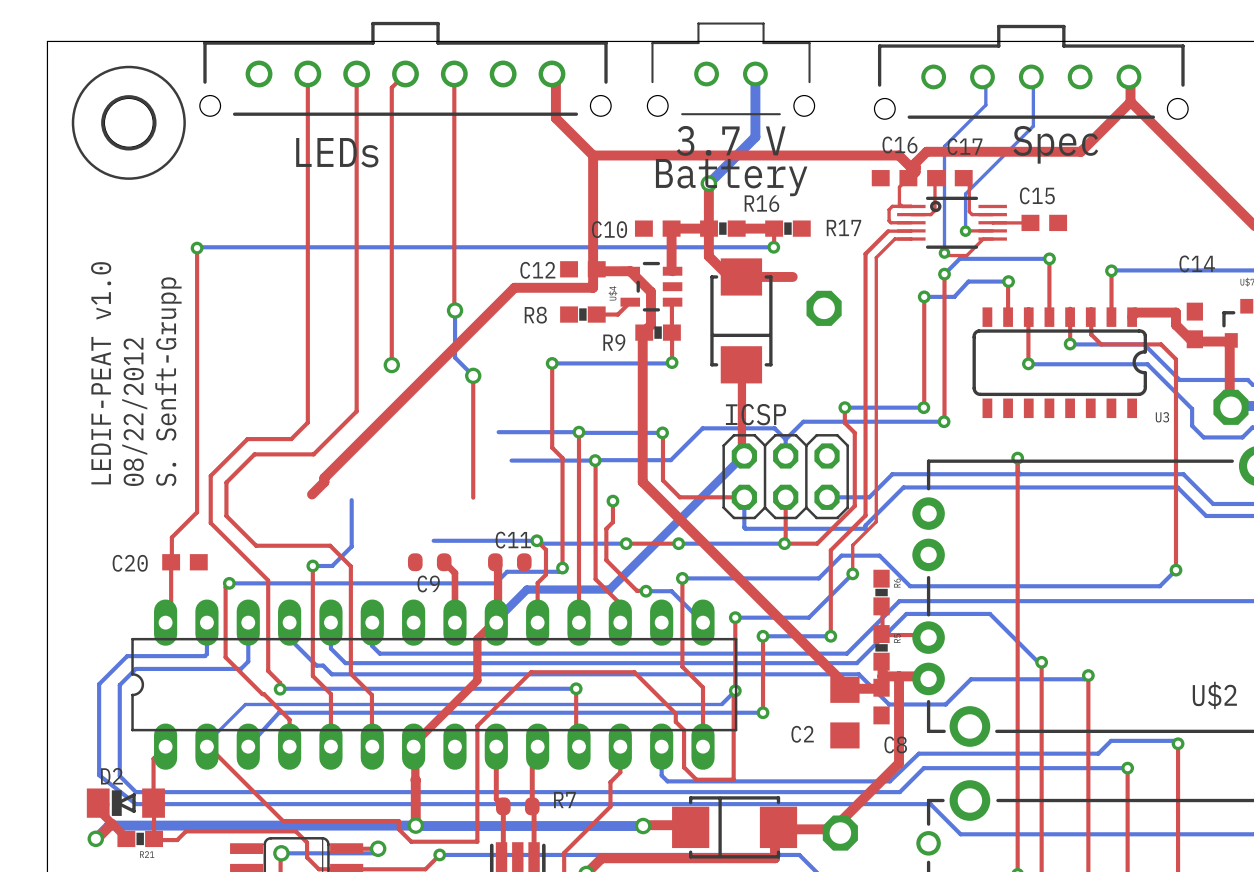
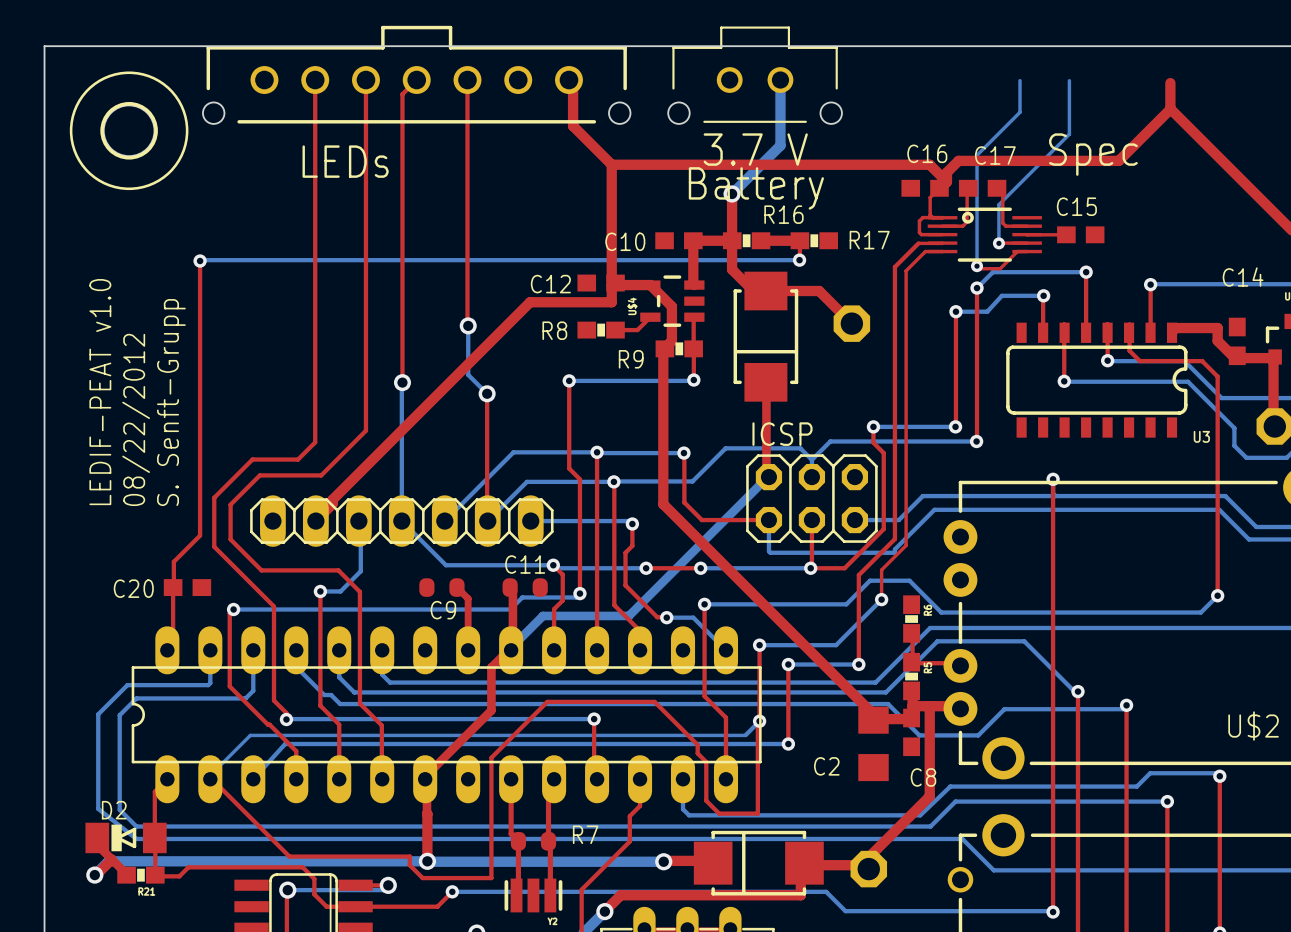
part: (1031, 72) -> none
top track: none -> (819, 291) (851, 323)
bottom track: none -> (401, 383) (401, 521) (446, 565)
bottom track: none -> (513, 452) (444, 521)
bottom track: none -> (526, 481) (487, 521)
part: none -> (401, 521)
bottom track: none -> (530, 521) (629, 521)

